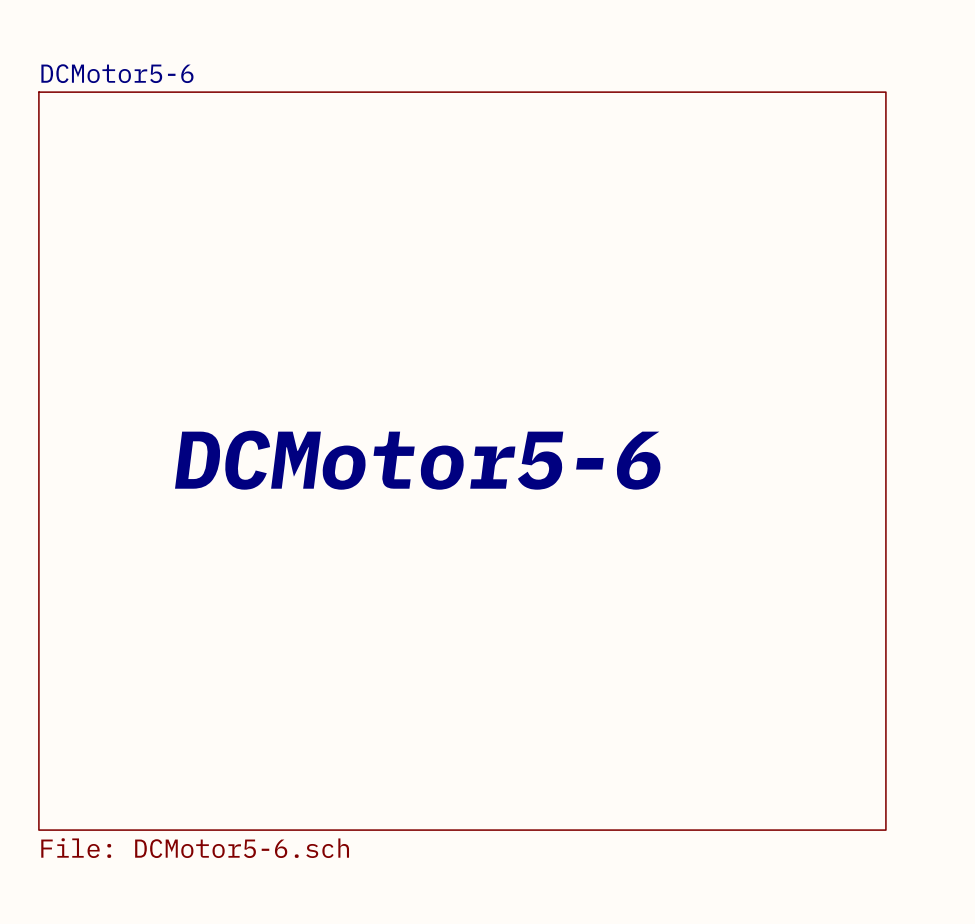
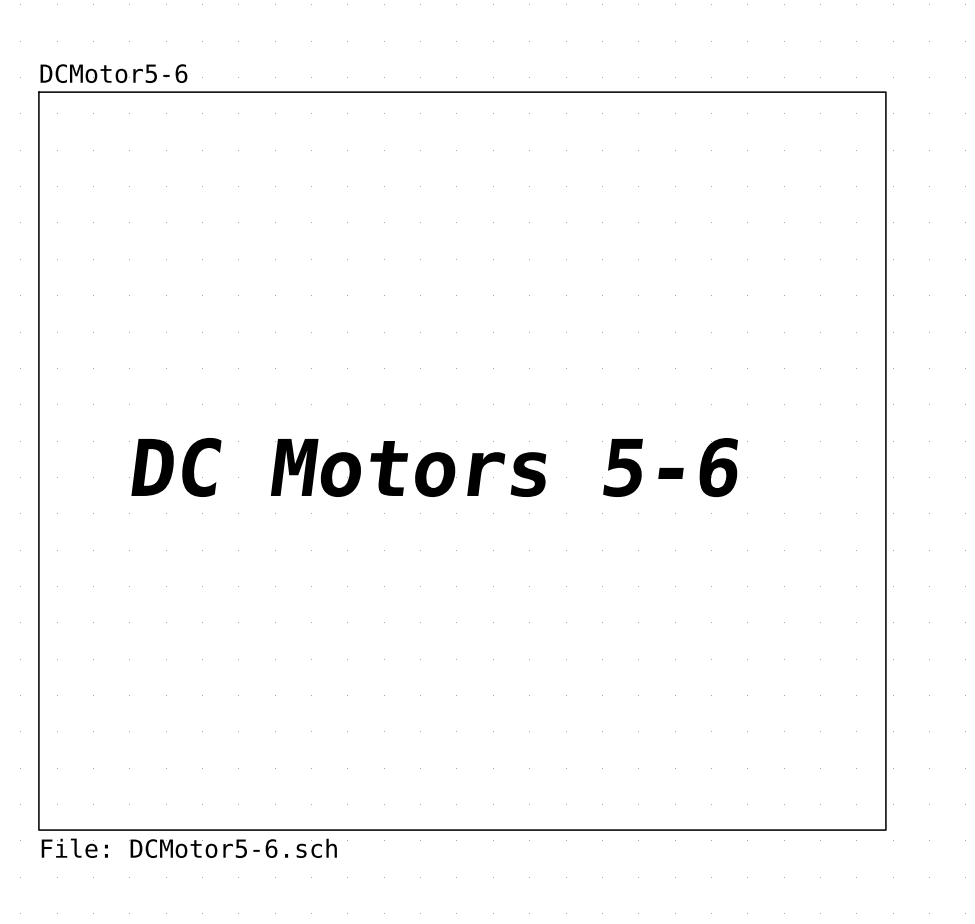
text: DCMotor5-6 (417, 460) -> DC Motors 5-6 (434, 467)

